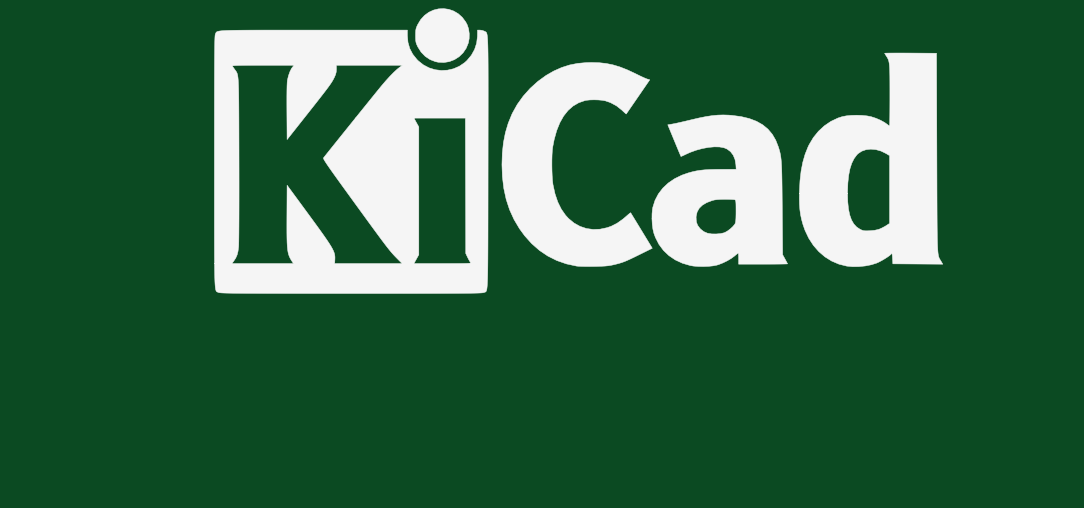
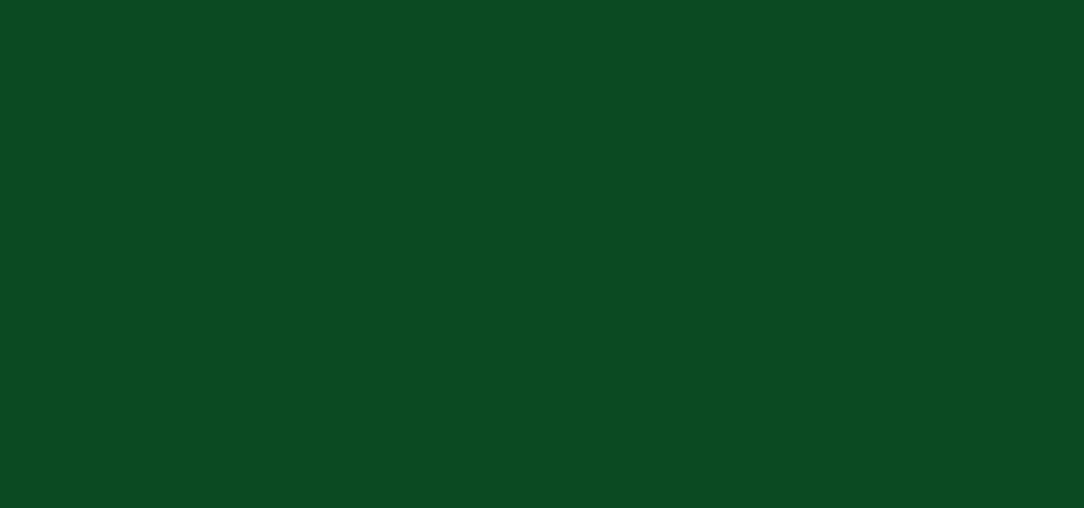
drawing: [214, 8, 944, 294] -> none

